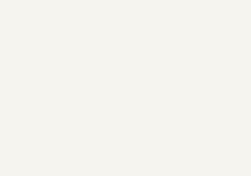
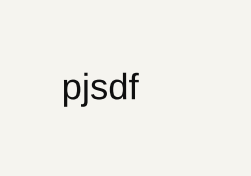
label: none -> pjsdf (101, 89)

